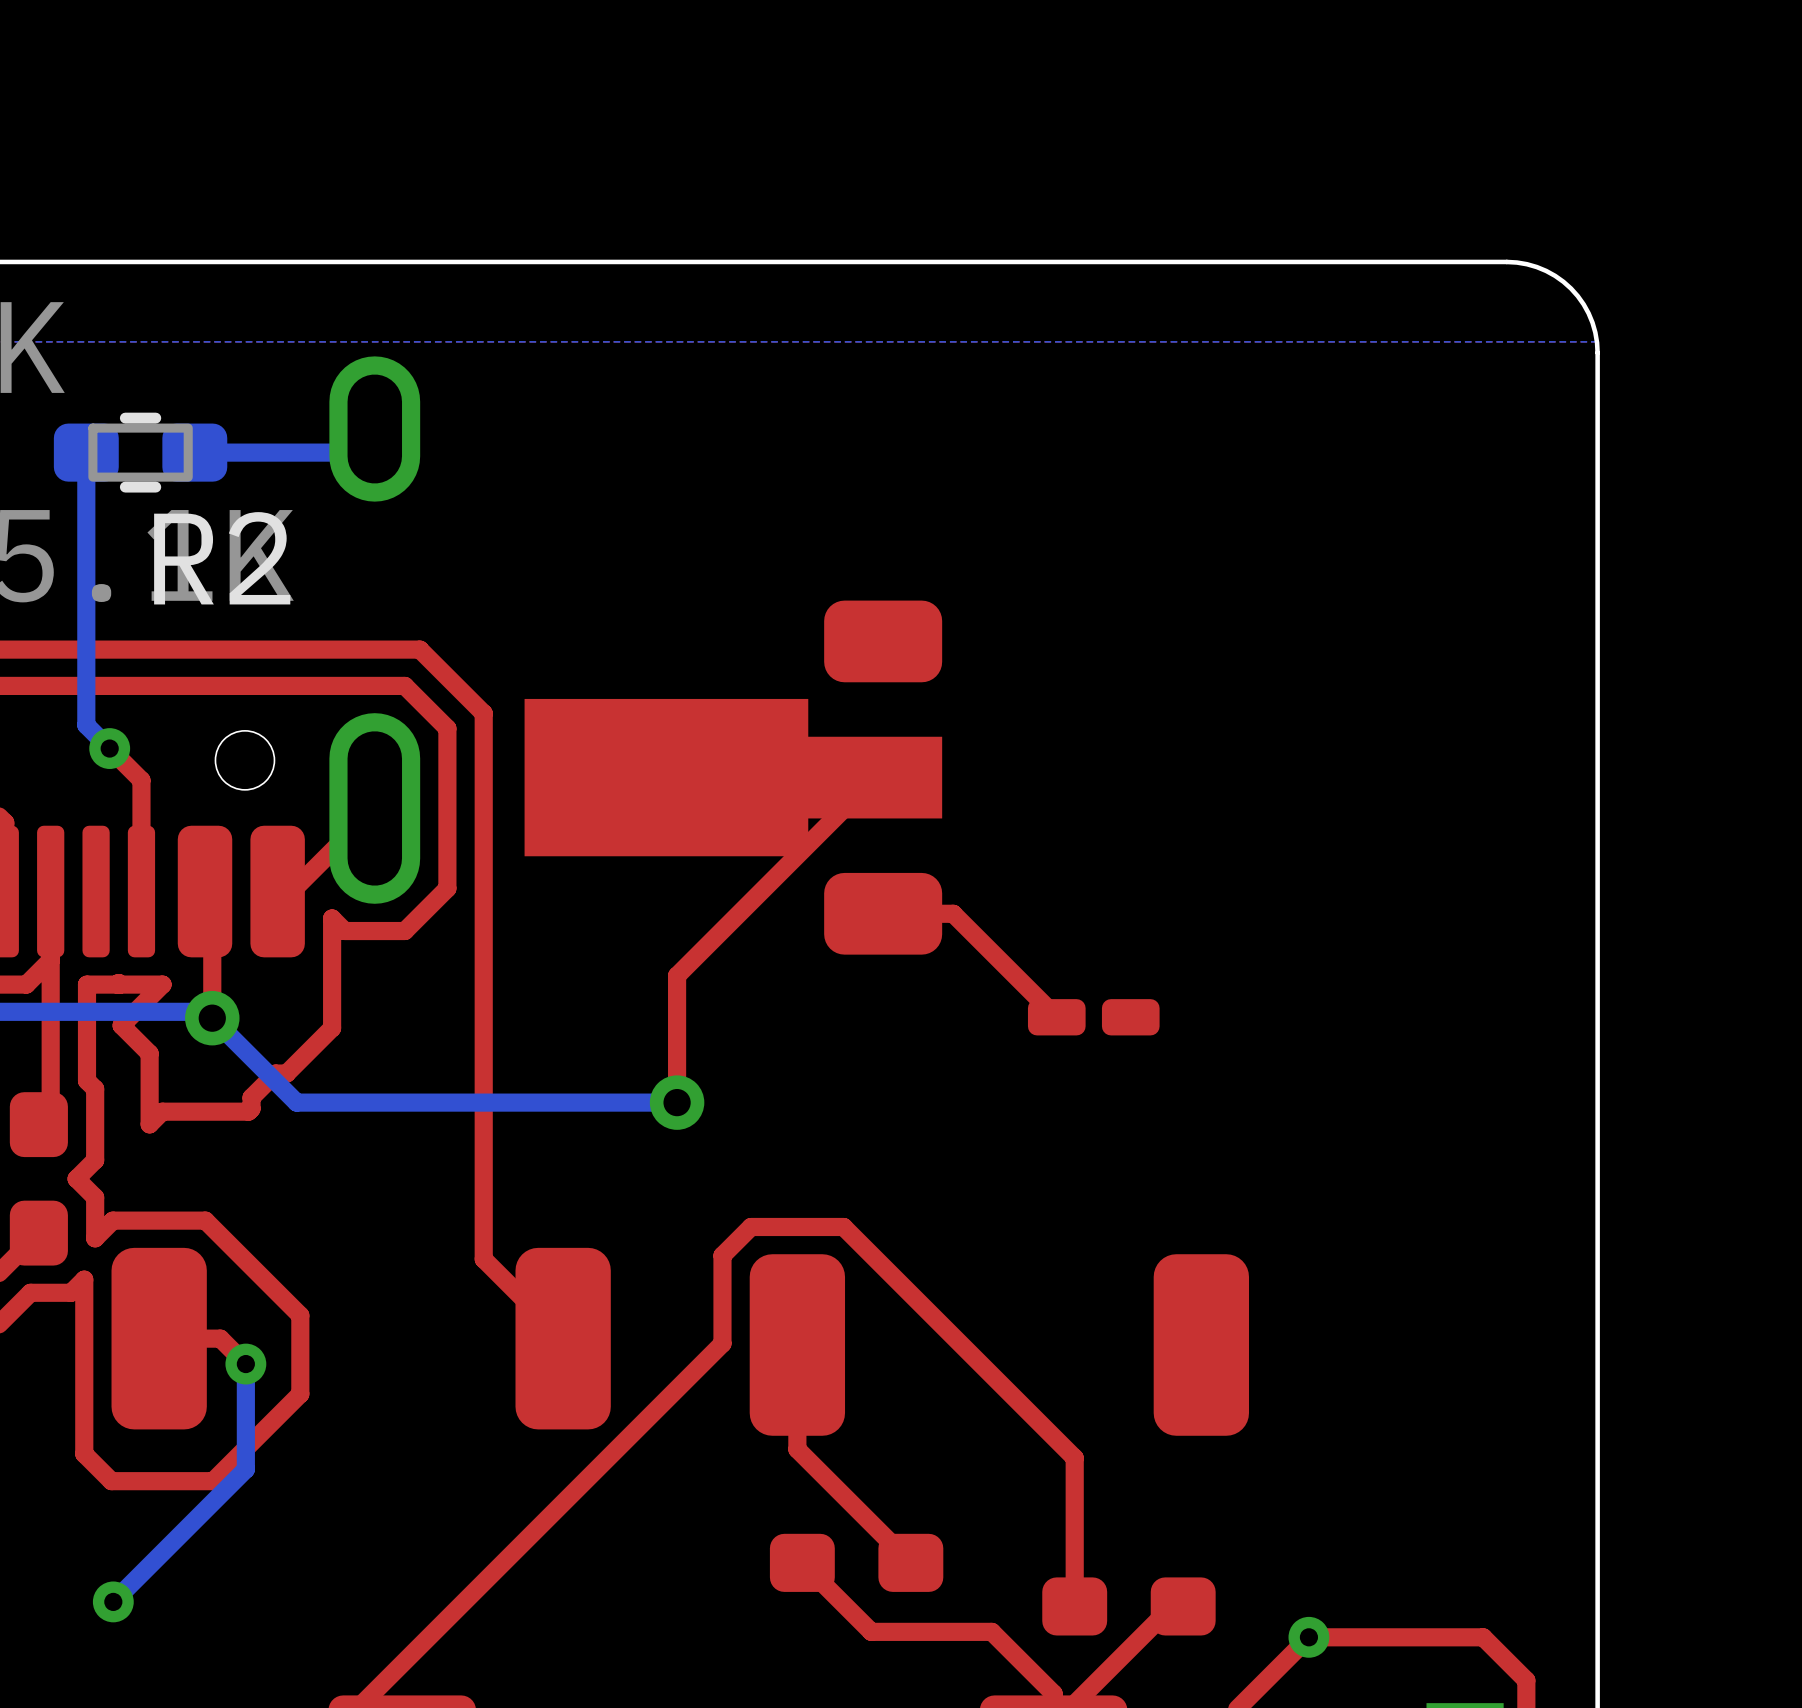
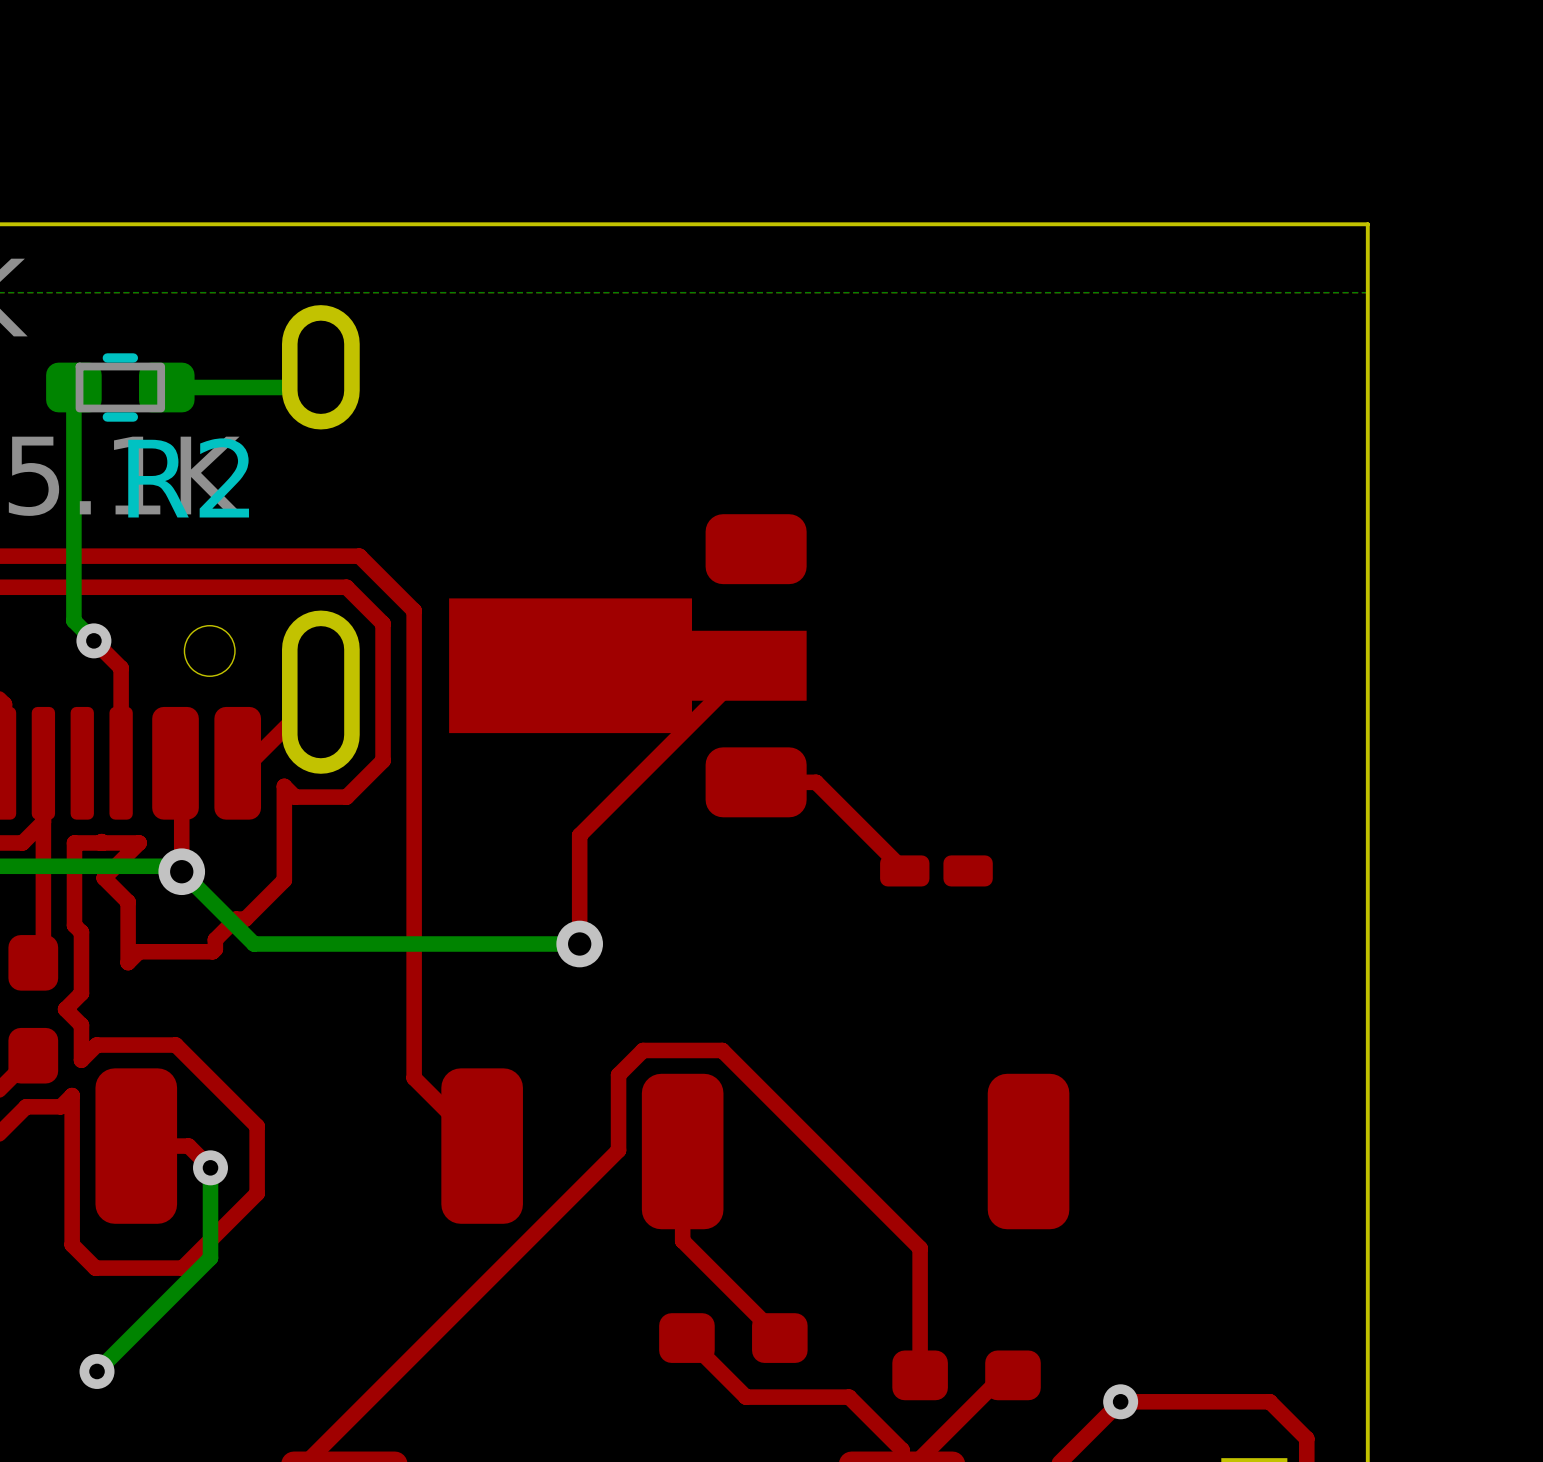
board edge: (1506, 261) (1536, 267) (1555, 275) (1571, 288) (1583, 304) (1592, 322) (1597, 352) -> (1290, 224) (1367, 224) (1367, 302)

